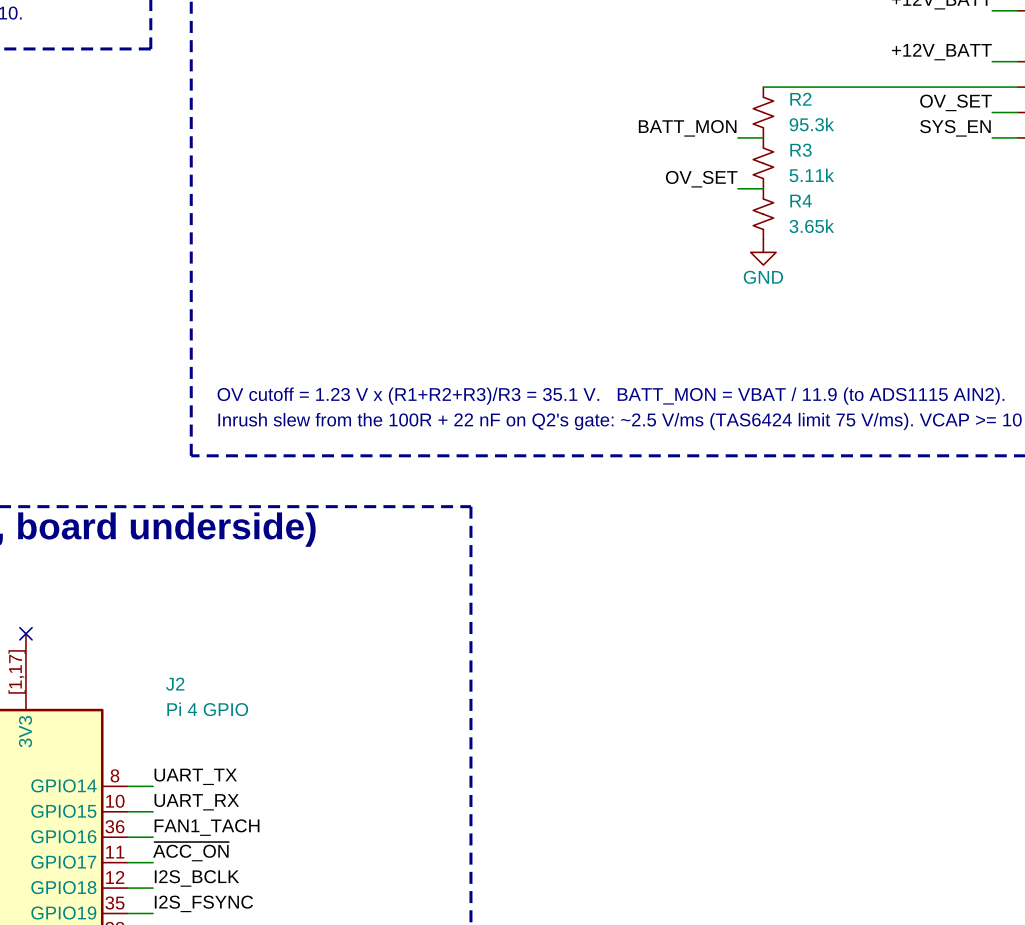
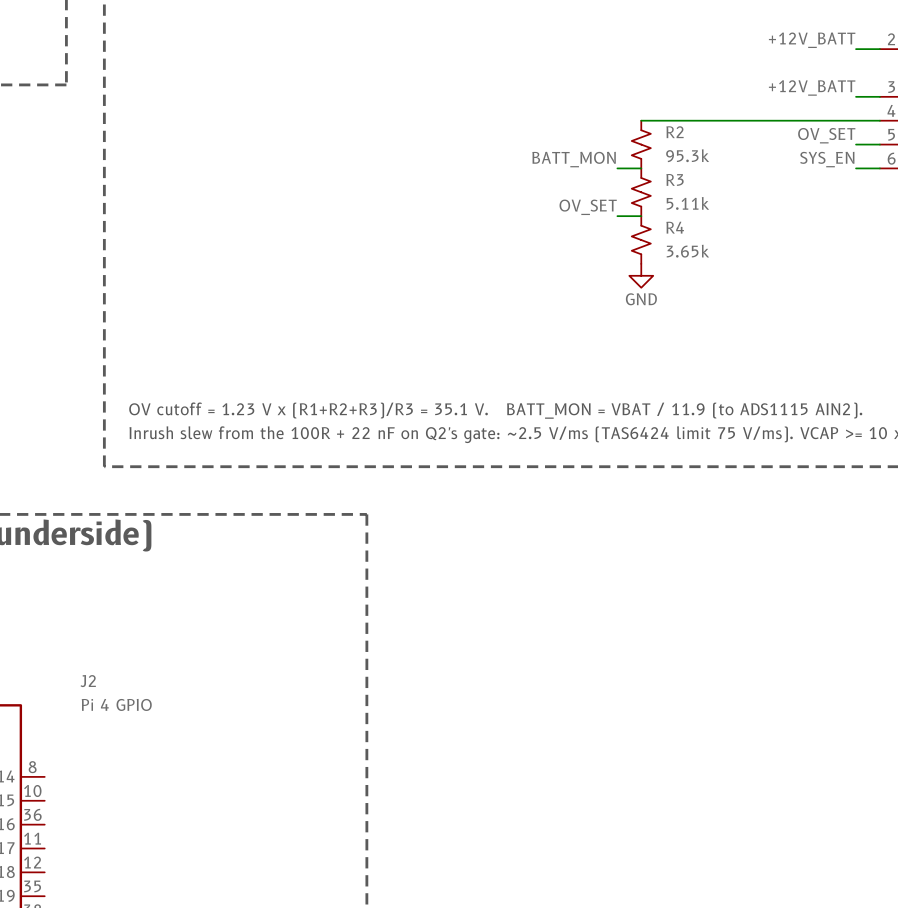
label: UART_TX (195, 776) -> none
wire: (127, 786) (153, 786) -> none
label: UART_RX (196, 802) -> none
wire: (127, 811) (153, 811) -> none
label: FAN1_TACH (207, 827) -> none
wire: (127, 837) (153, 837) -> none
label: ~{ACC_ON} (191, 851) -> none
wire: (127, 862) (153, 862) -> none
label: I2S_BCLK (197, 878) -> none
wire: (127, 888) (153, 888) -> none
label: I2S_FSYNC (203, 903) -> none
wire: (127, 913) (153, 913) -> none

